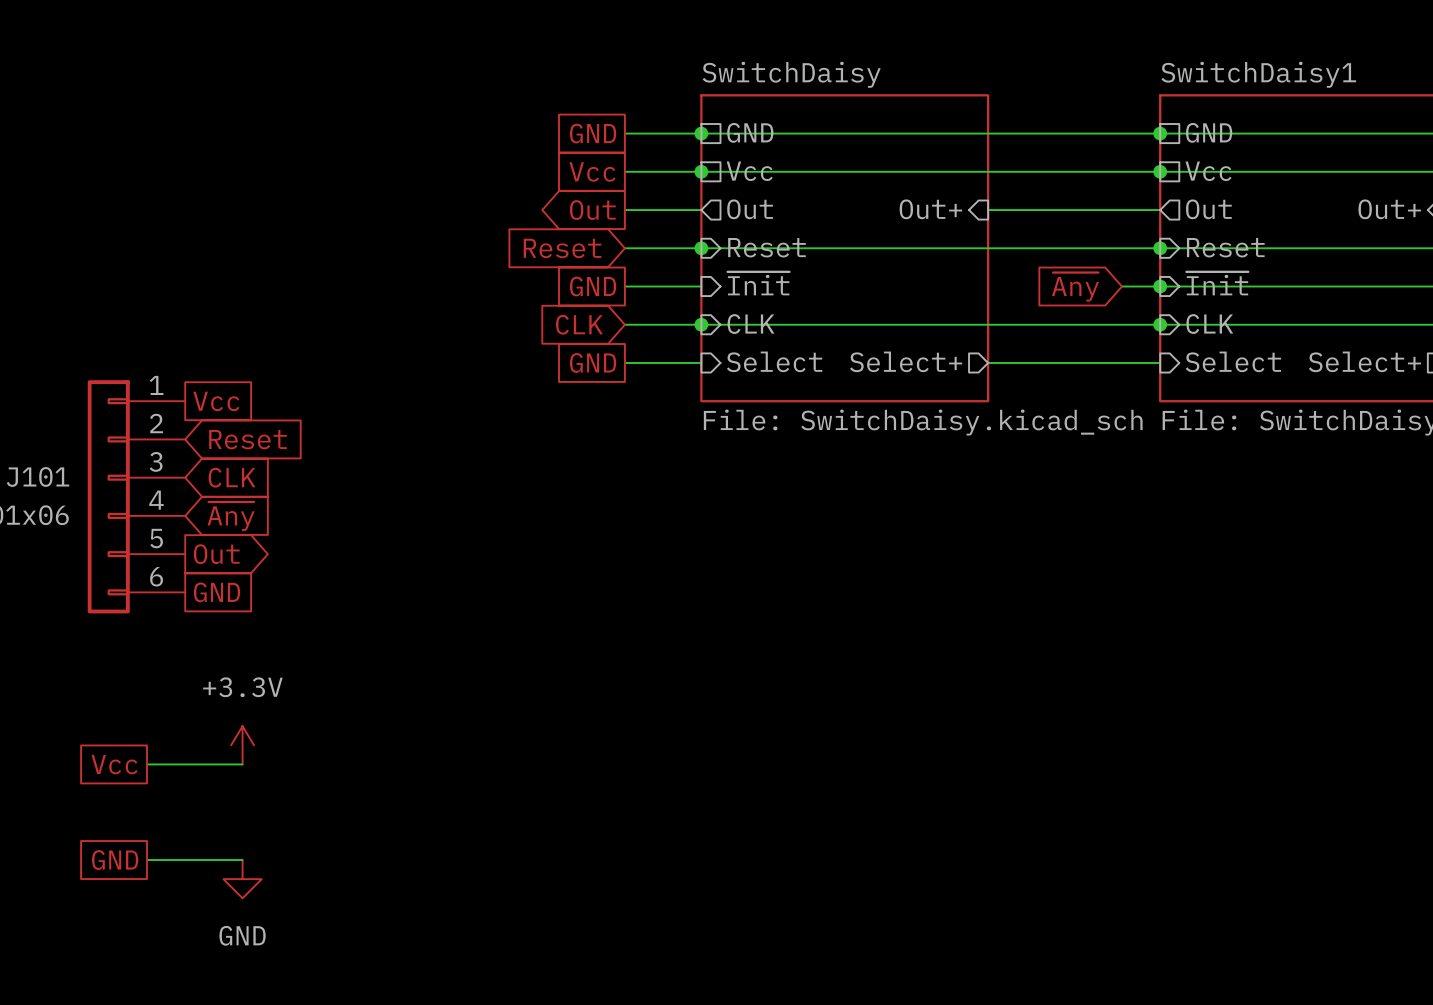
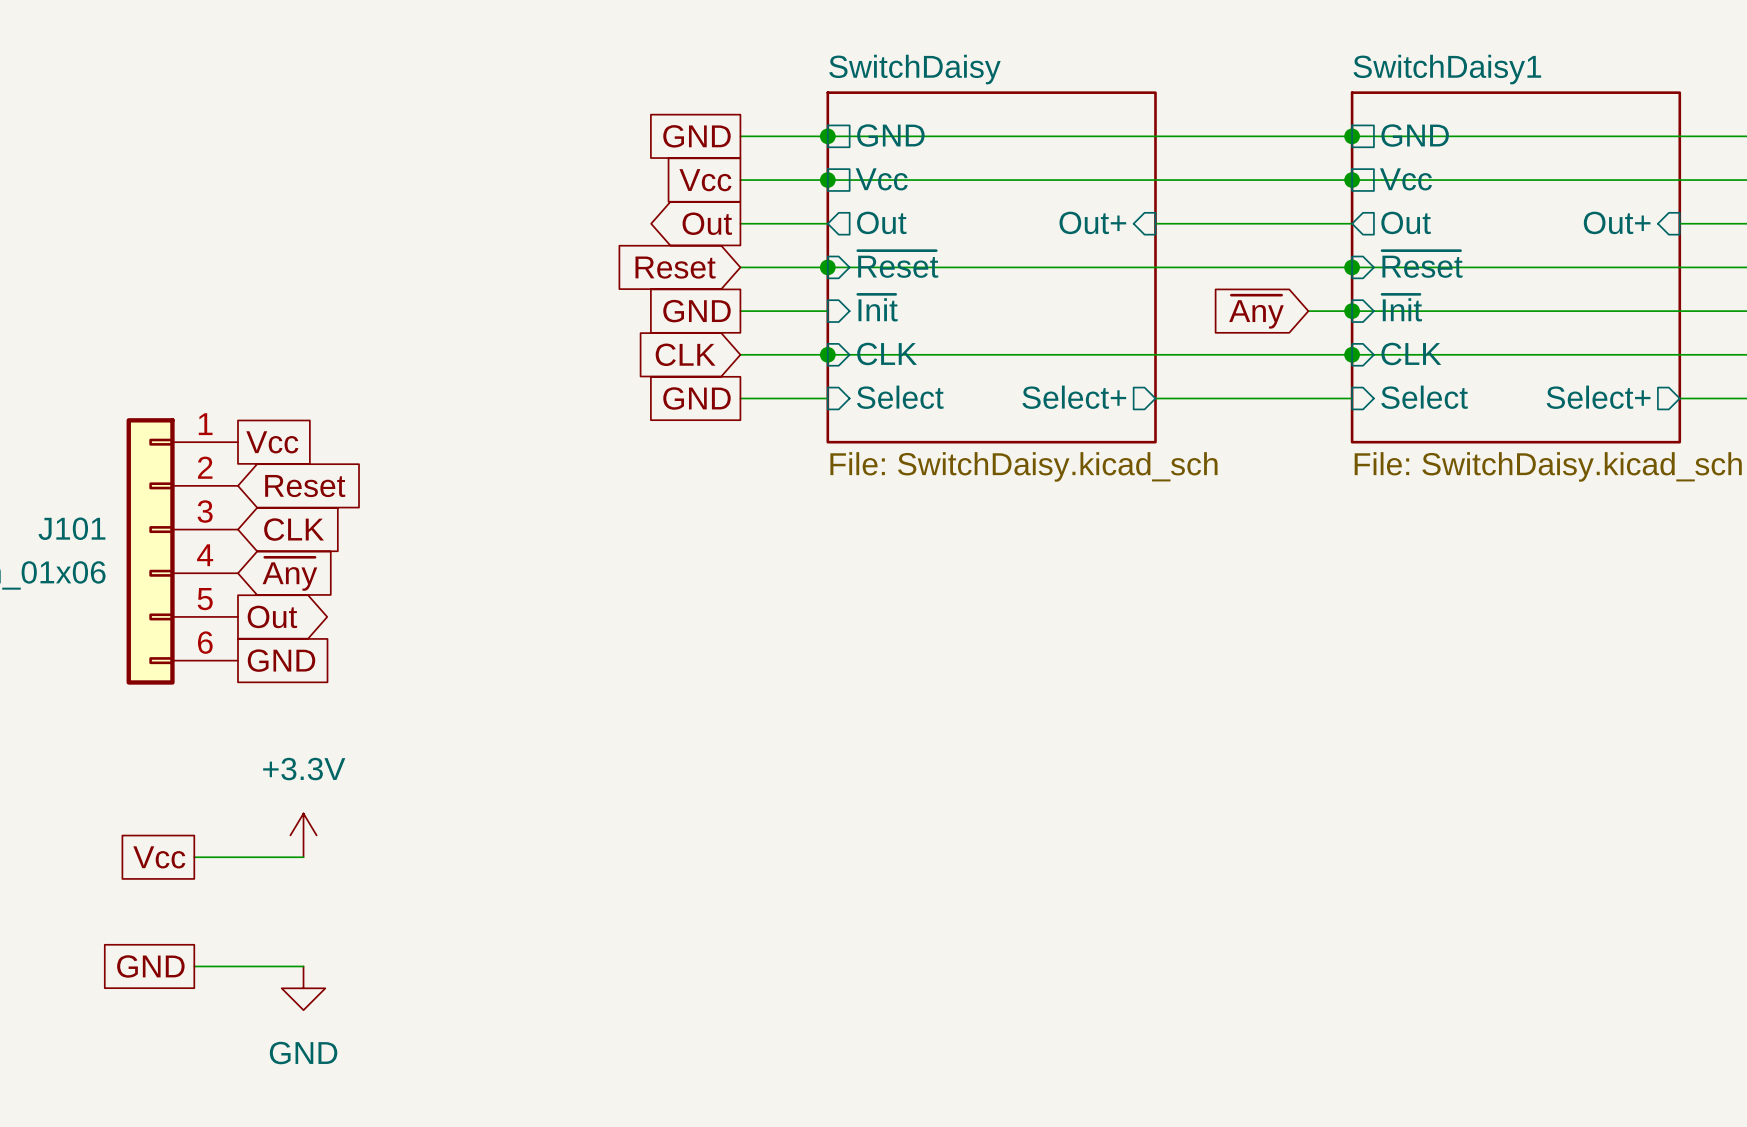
sheet pin: Reset (766, 247) -> ~{Reset} (898, 264)
sheet pin: Reset (1225, 247) -> ~{Reset} (1422, 264)

